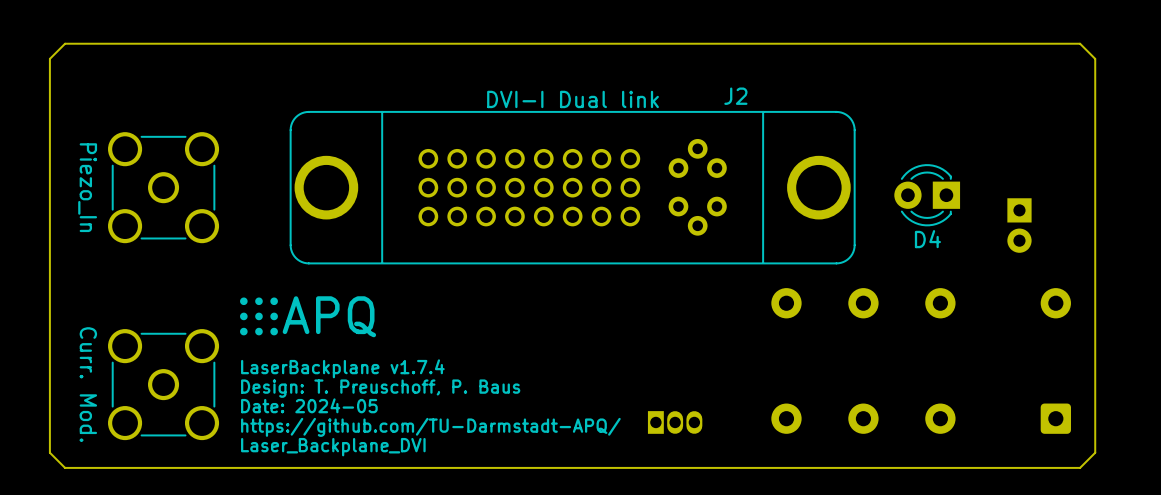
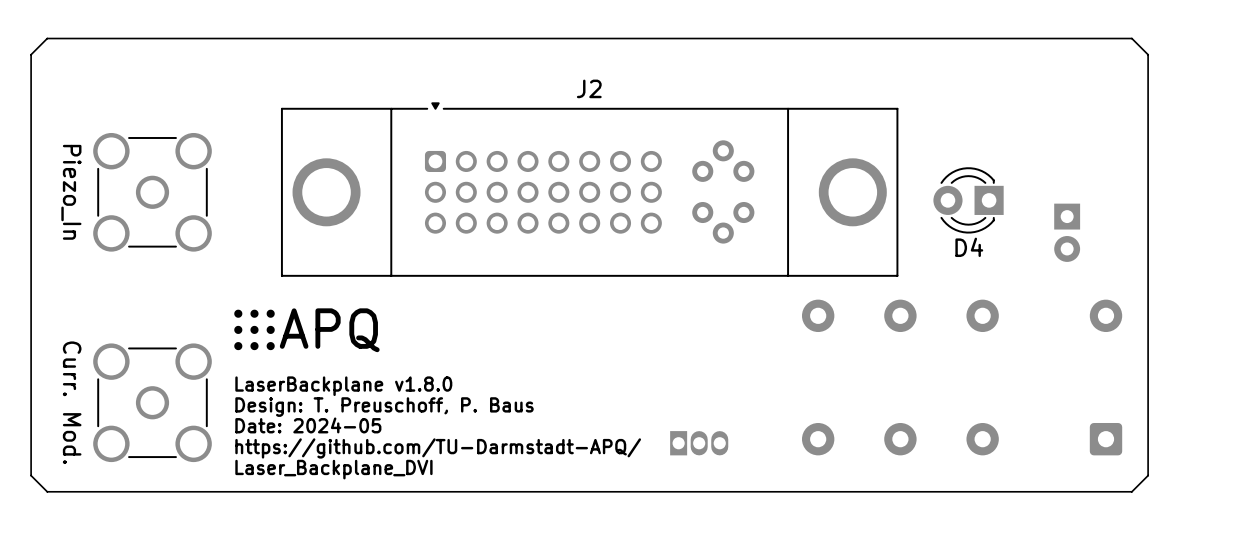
J2 name position: J2 (735, 96) -> J2 (589, 88)
J2 footprint: [289, 111, 856, 265] -> [280, 102, 899, 277]
text: LaserBackplane v1.7.4 (342, 368) -> LaserBackplane v1.8.0 (343, 386)

